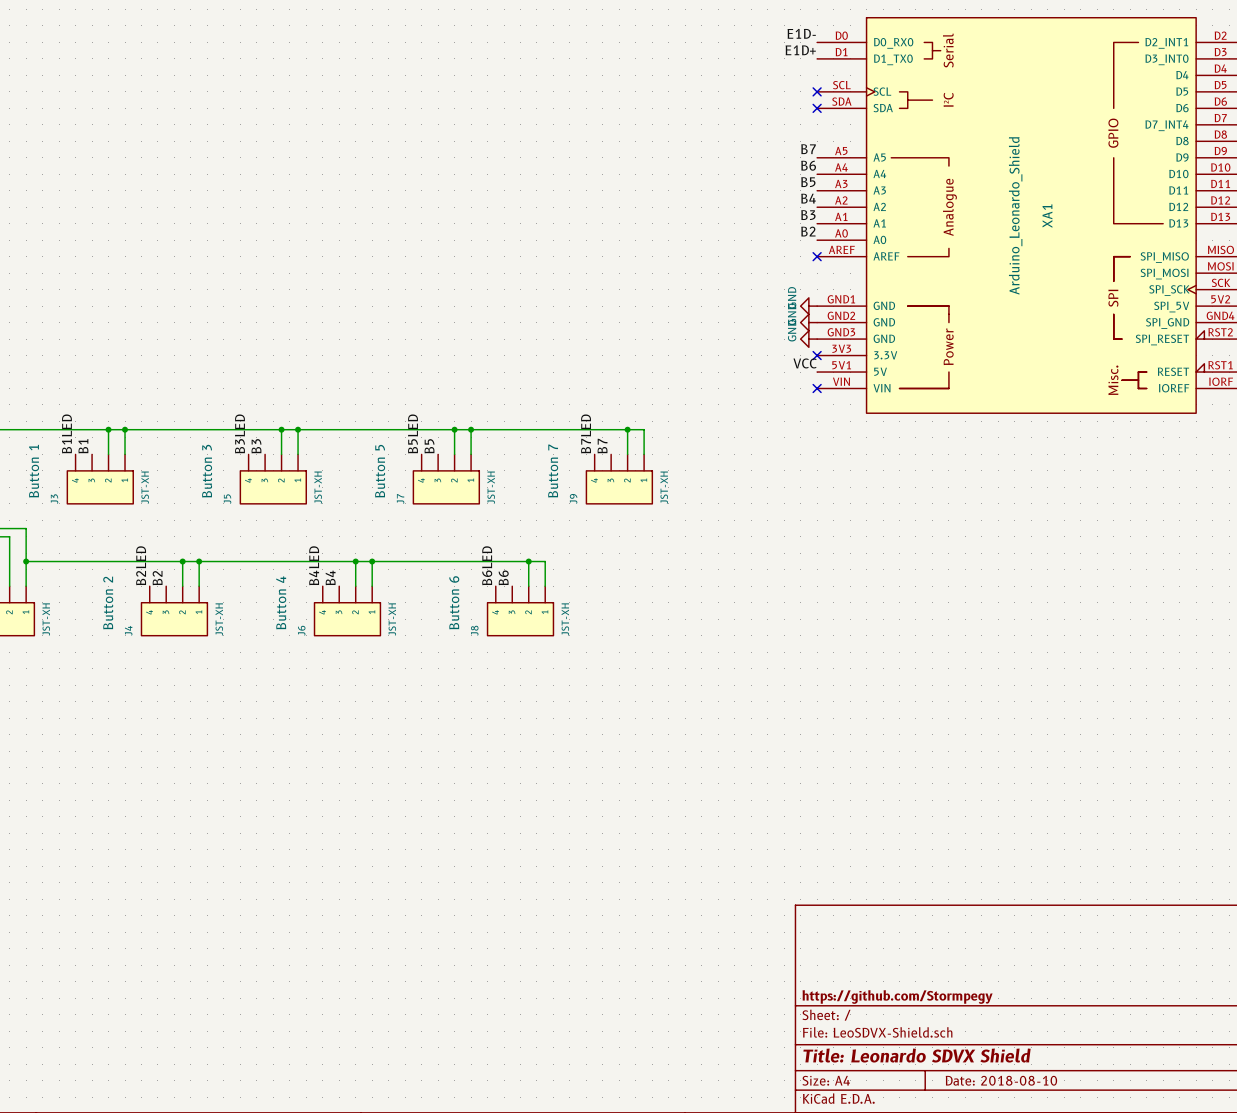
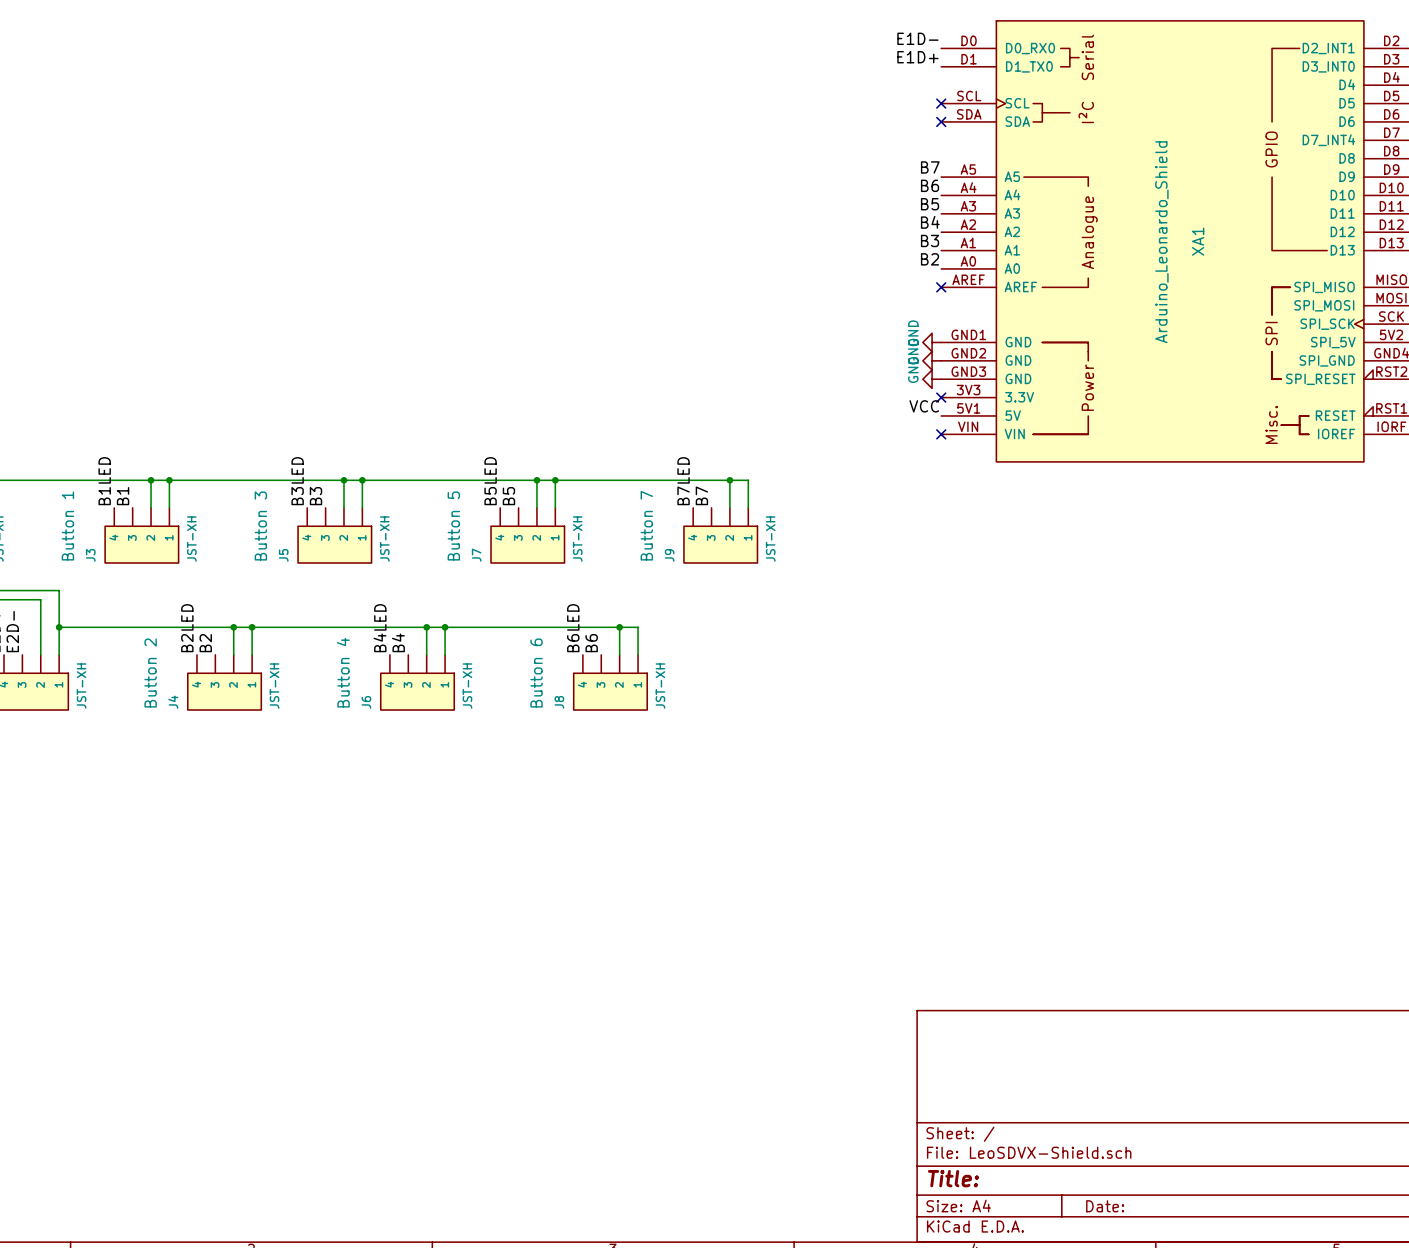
title block: https://github.com/Stormpegy (897, 997) -> none
title block: Title: Leonardo SDVX Shield (917, 1055) -> Title: (953, 1178)
title block: Date: 2018-08-10 (1001, 1080) -> Date: (1105, 1206)

